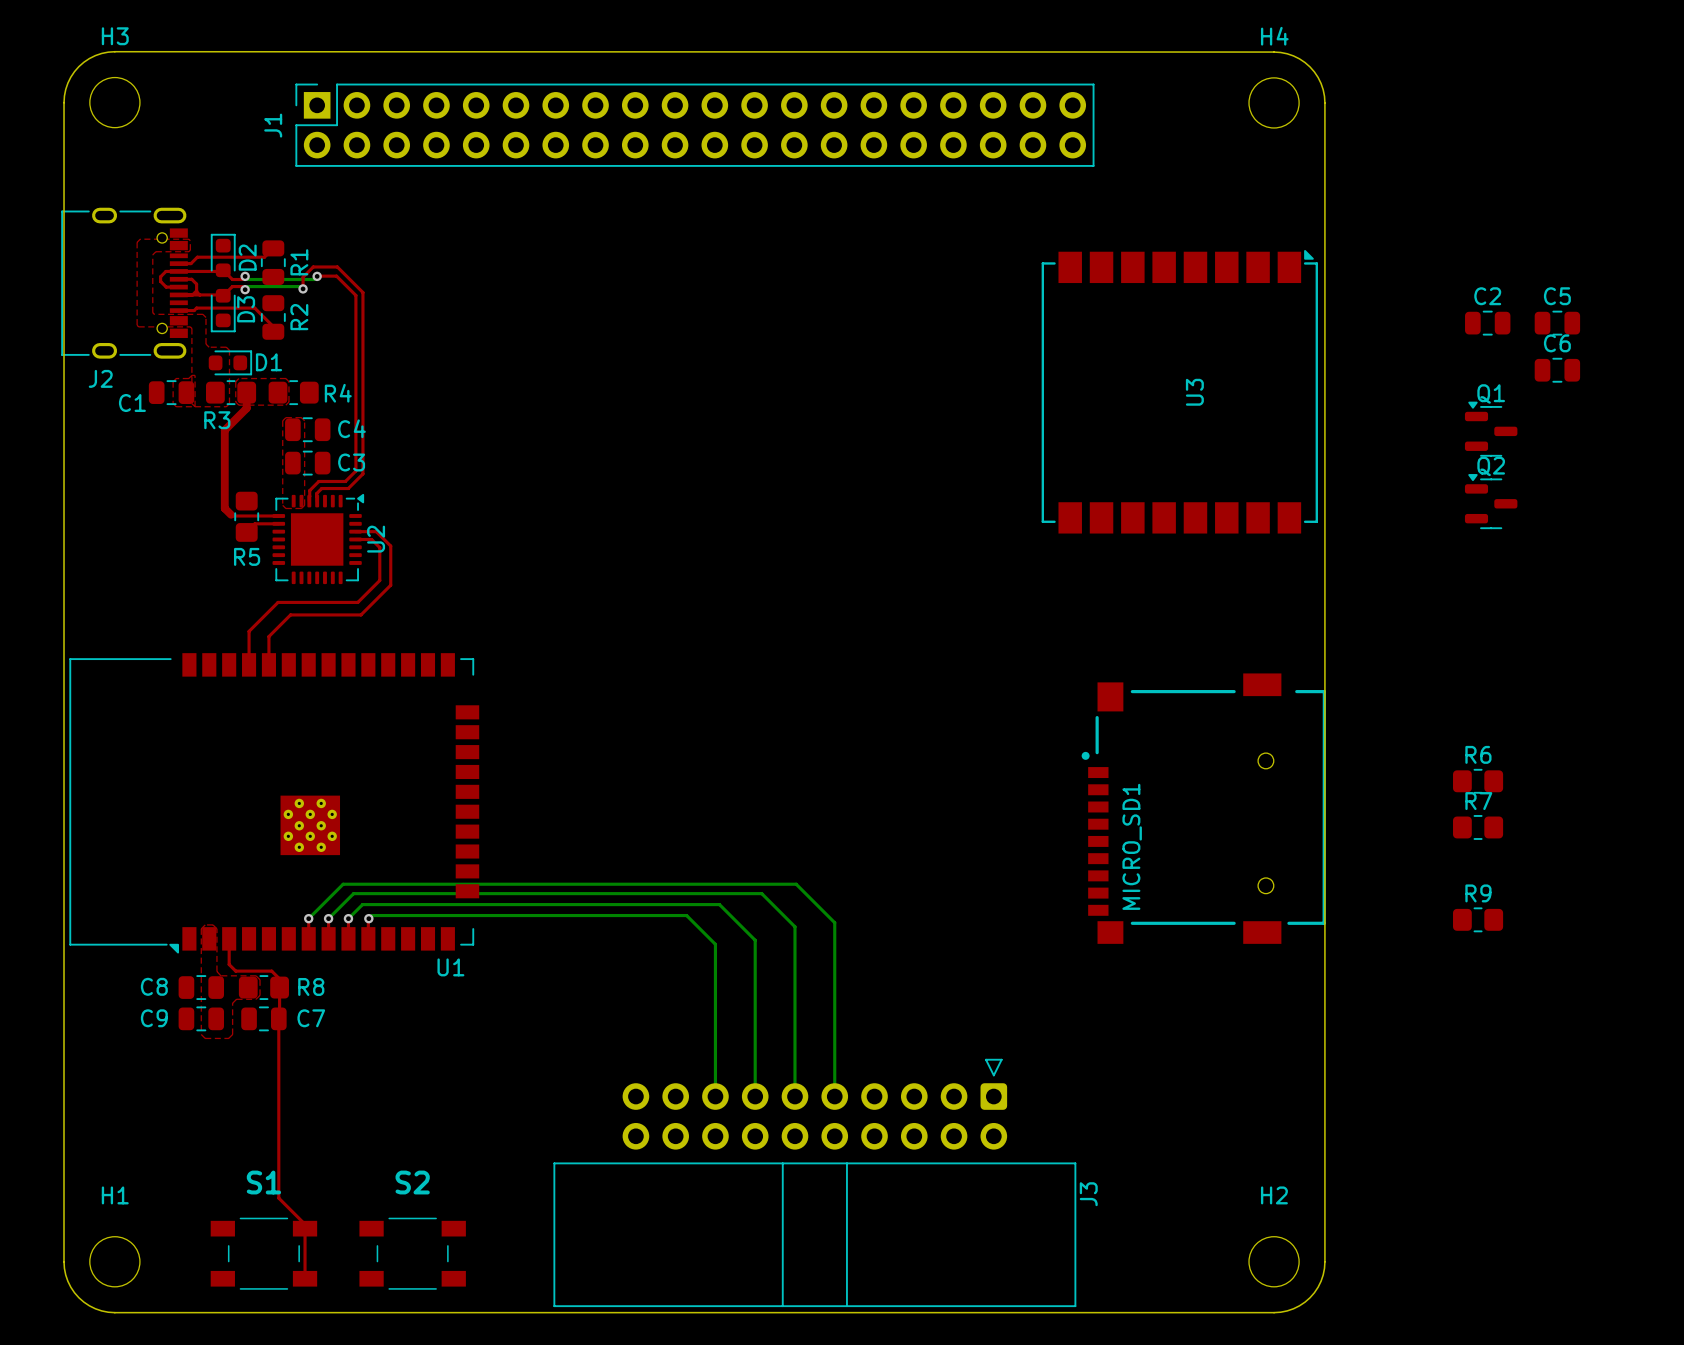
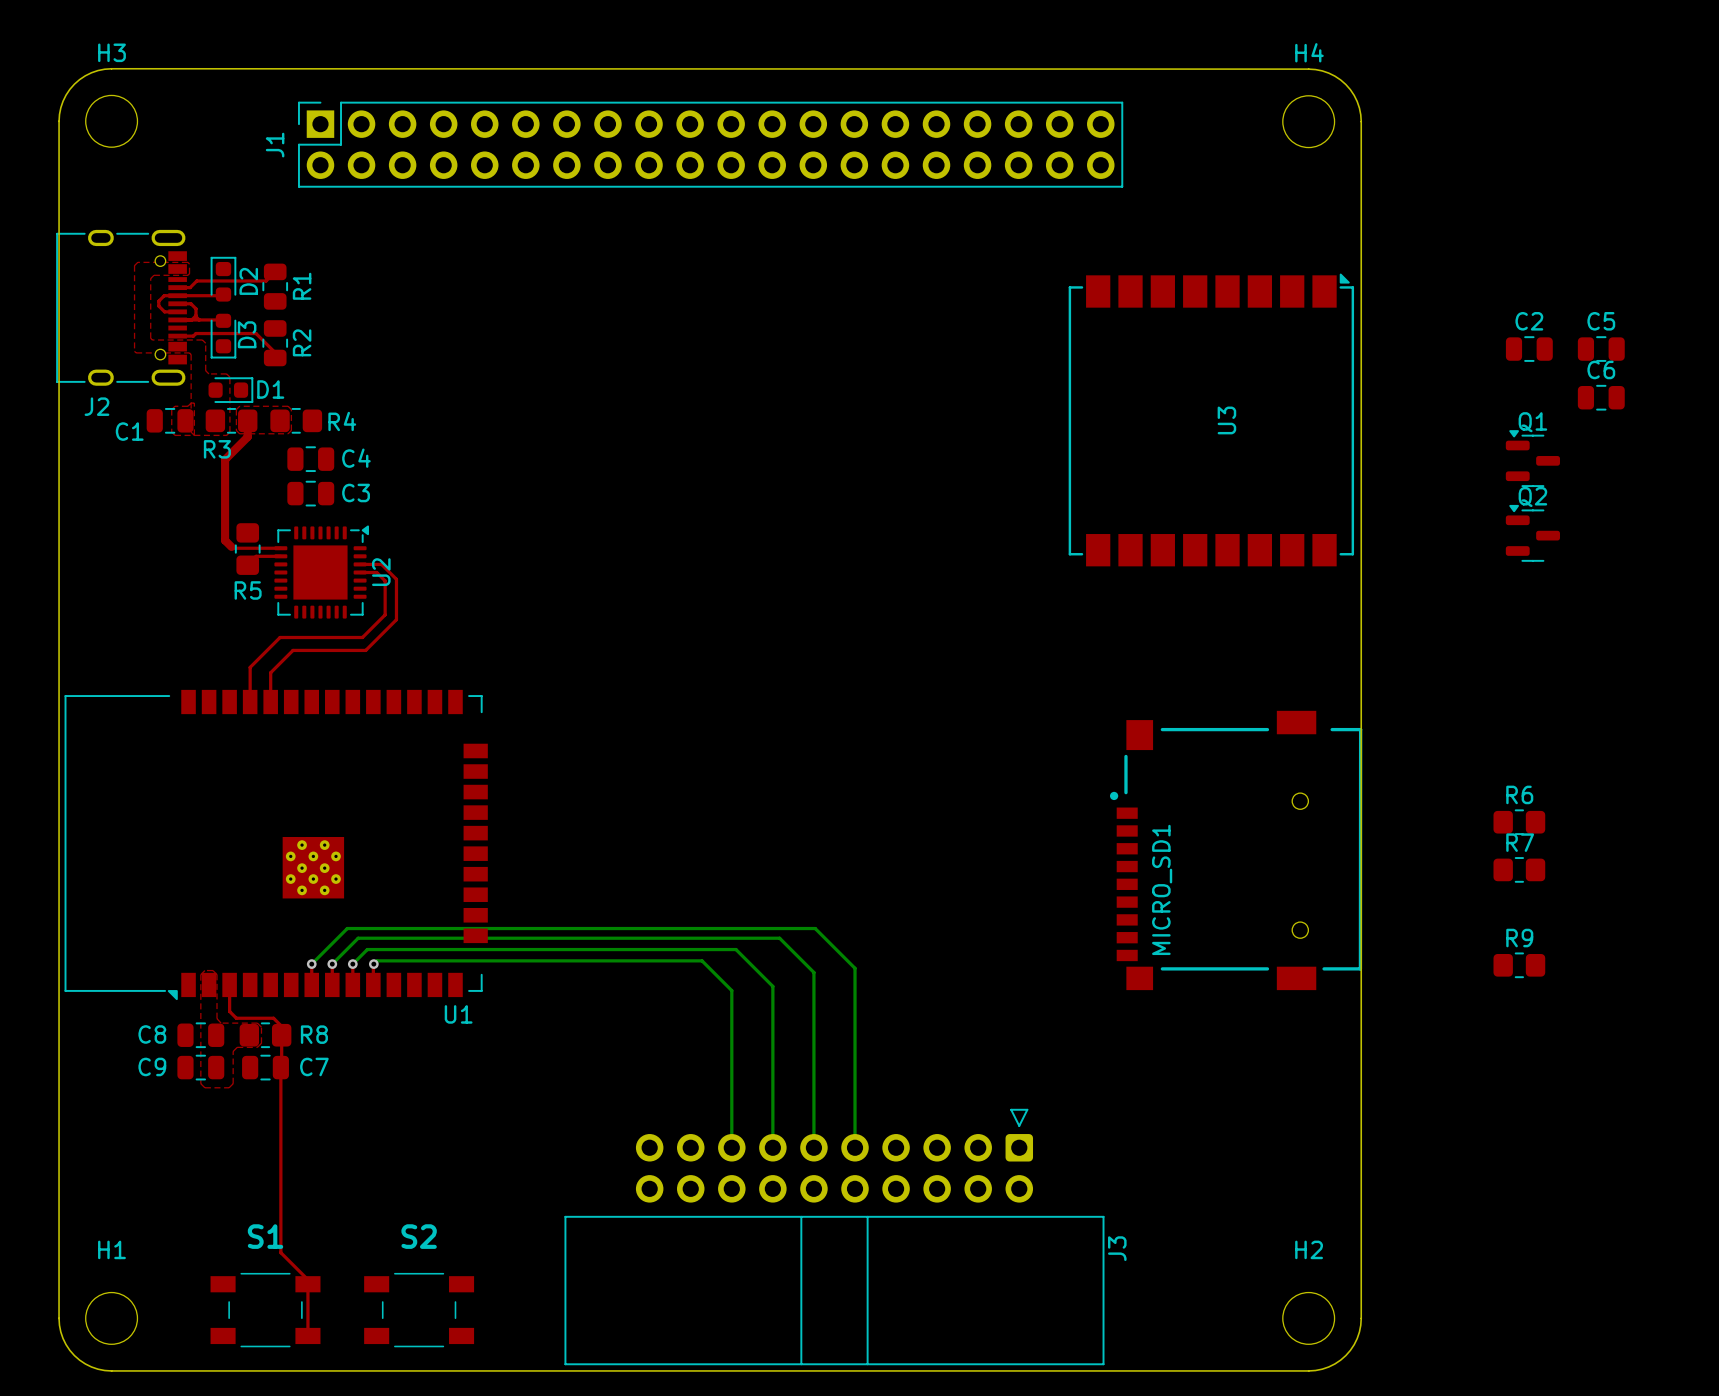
top track: (223, 270) (232, 279) (242, 279) (245, 276) -> none
bottom track: (245, 276) (248, 279) (314, 279) (317, 276) -> none
via: (245, 276) -> none
top track: (317, 276) (336, 276) (355, 295) (355, 471) (345, 481) (318, 481) (309, 490) (309, 501) -> none
via: (317, 276) -> none
top track: (303, 288) (303, 277) (313, 266) (337, 266) (362, 292) (362, 473) (348, 488) (321, 488) (316, 493) (317, 501) -> none
bottom track: (303, 288) (300, 286) (248, 286) (245, 289) -> none
via: (303, 288) -> none
top track: (245, 289) (242, 286) (232, 286) (223, 295) -> none
via: (245, 289) -> none
top zone outline: (285, 417) (301, 417) (304, 420) (304, 505) (301, 508) (285, 508) (282, 505) (282, 420) (285, 417) -> none

